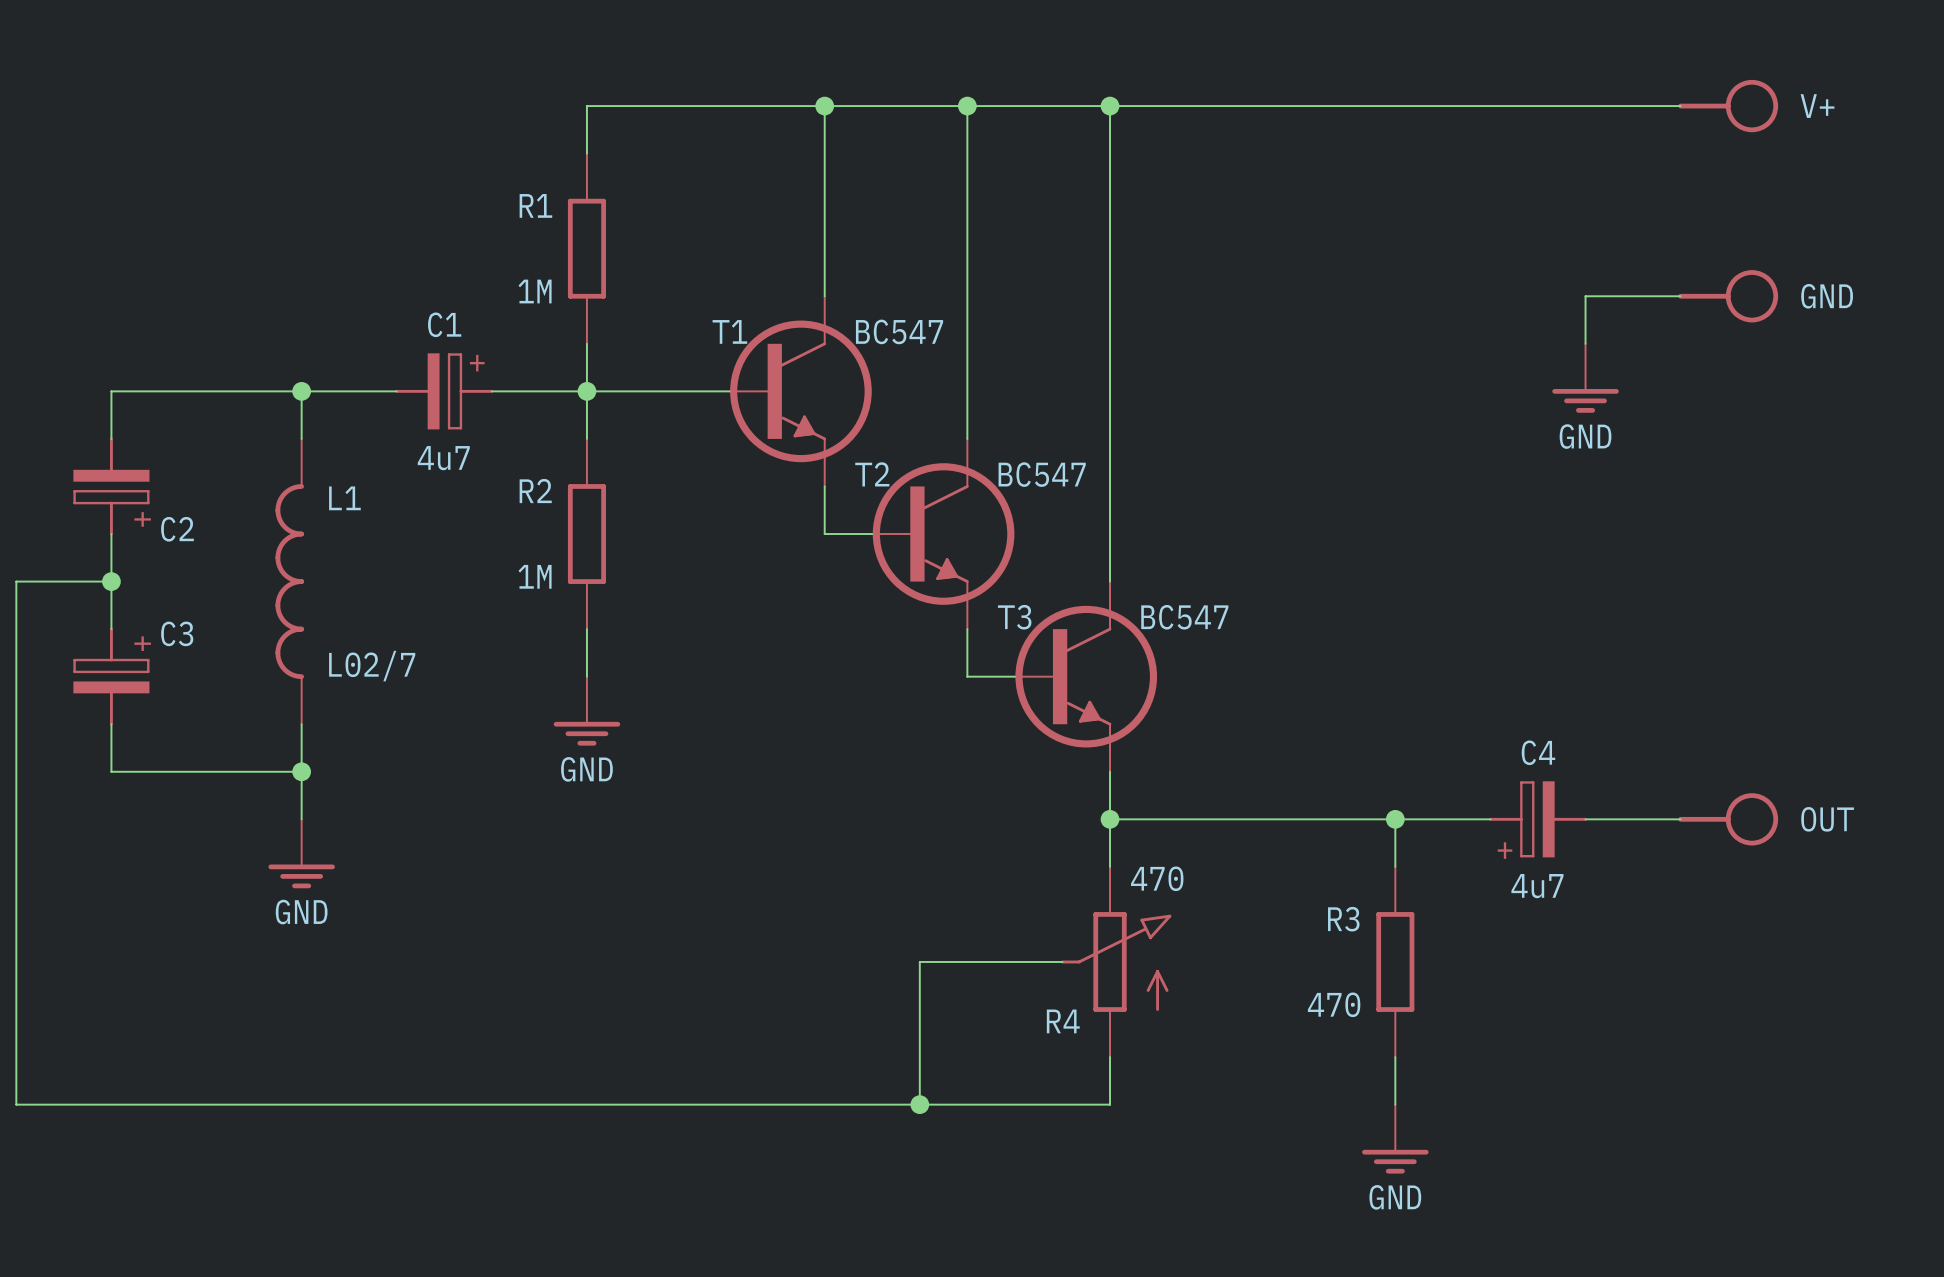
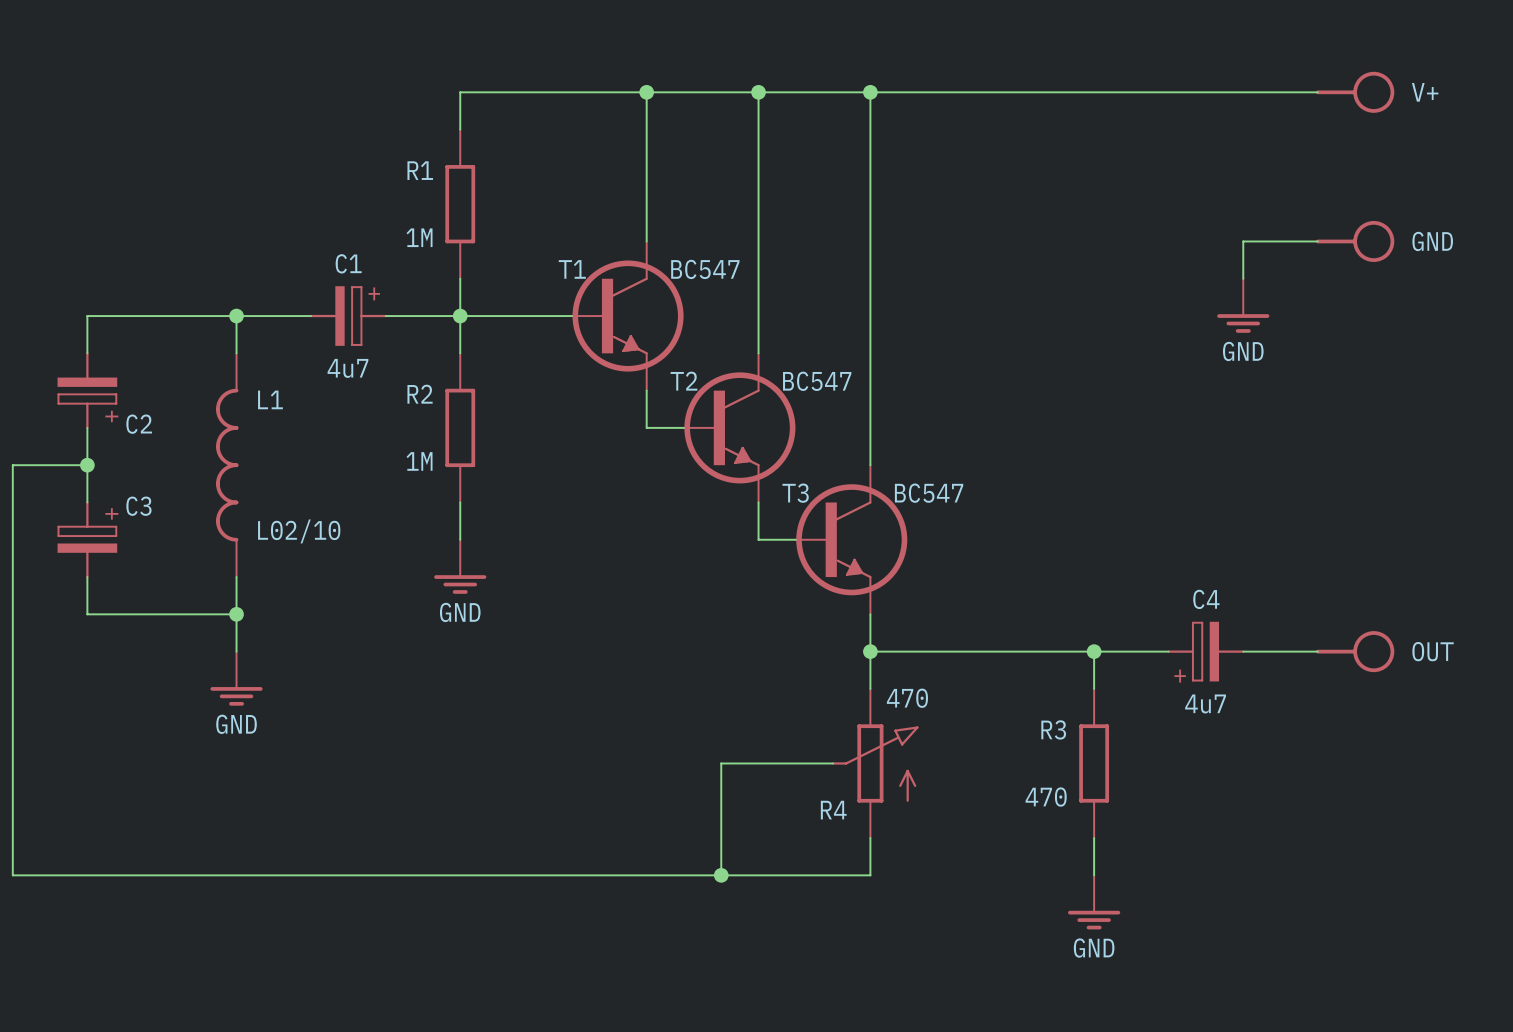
L1 value: L02/7 (372, 666) -> L02/10 (299, 531)

